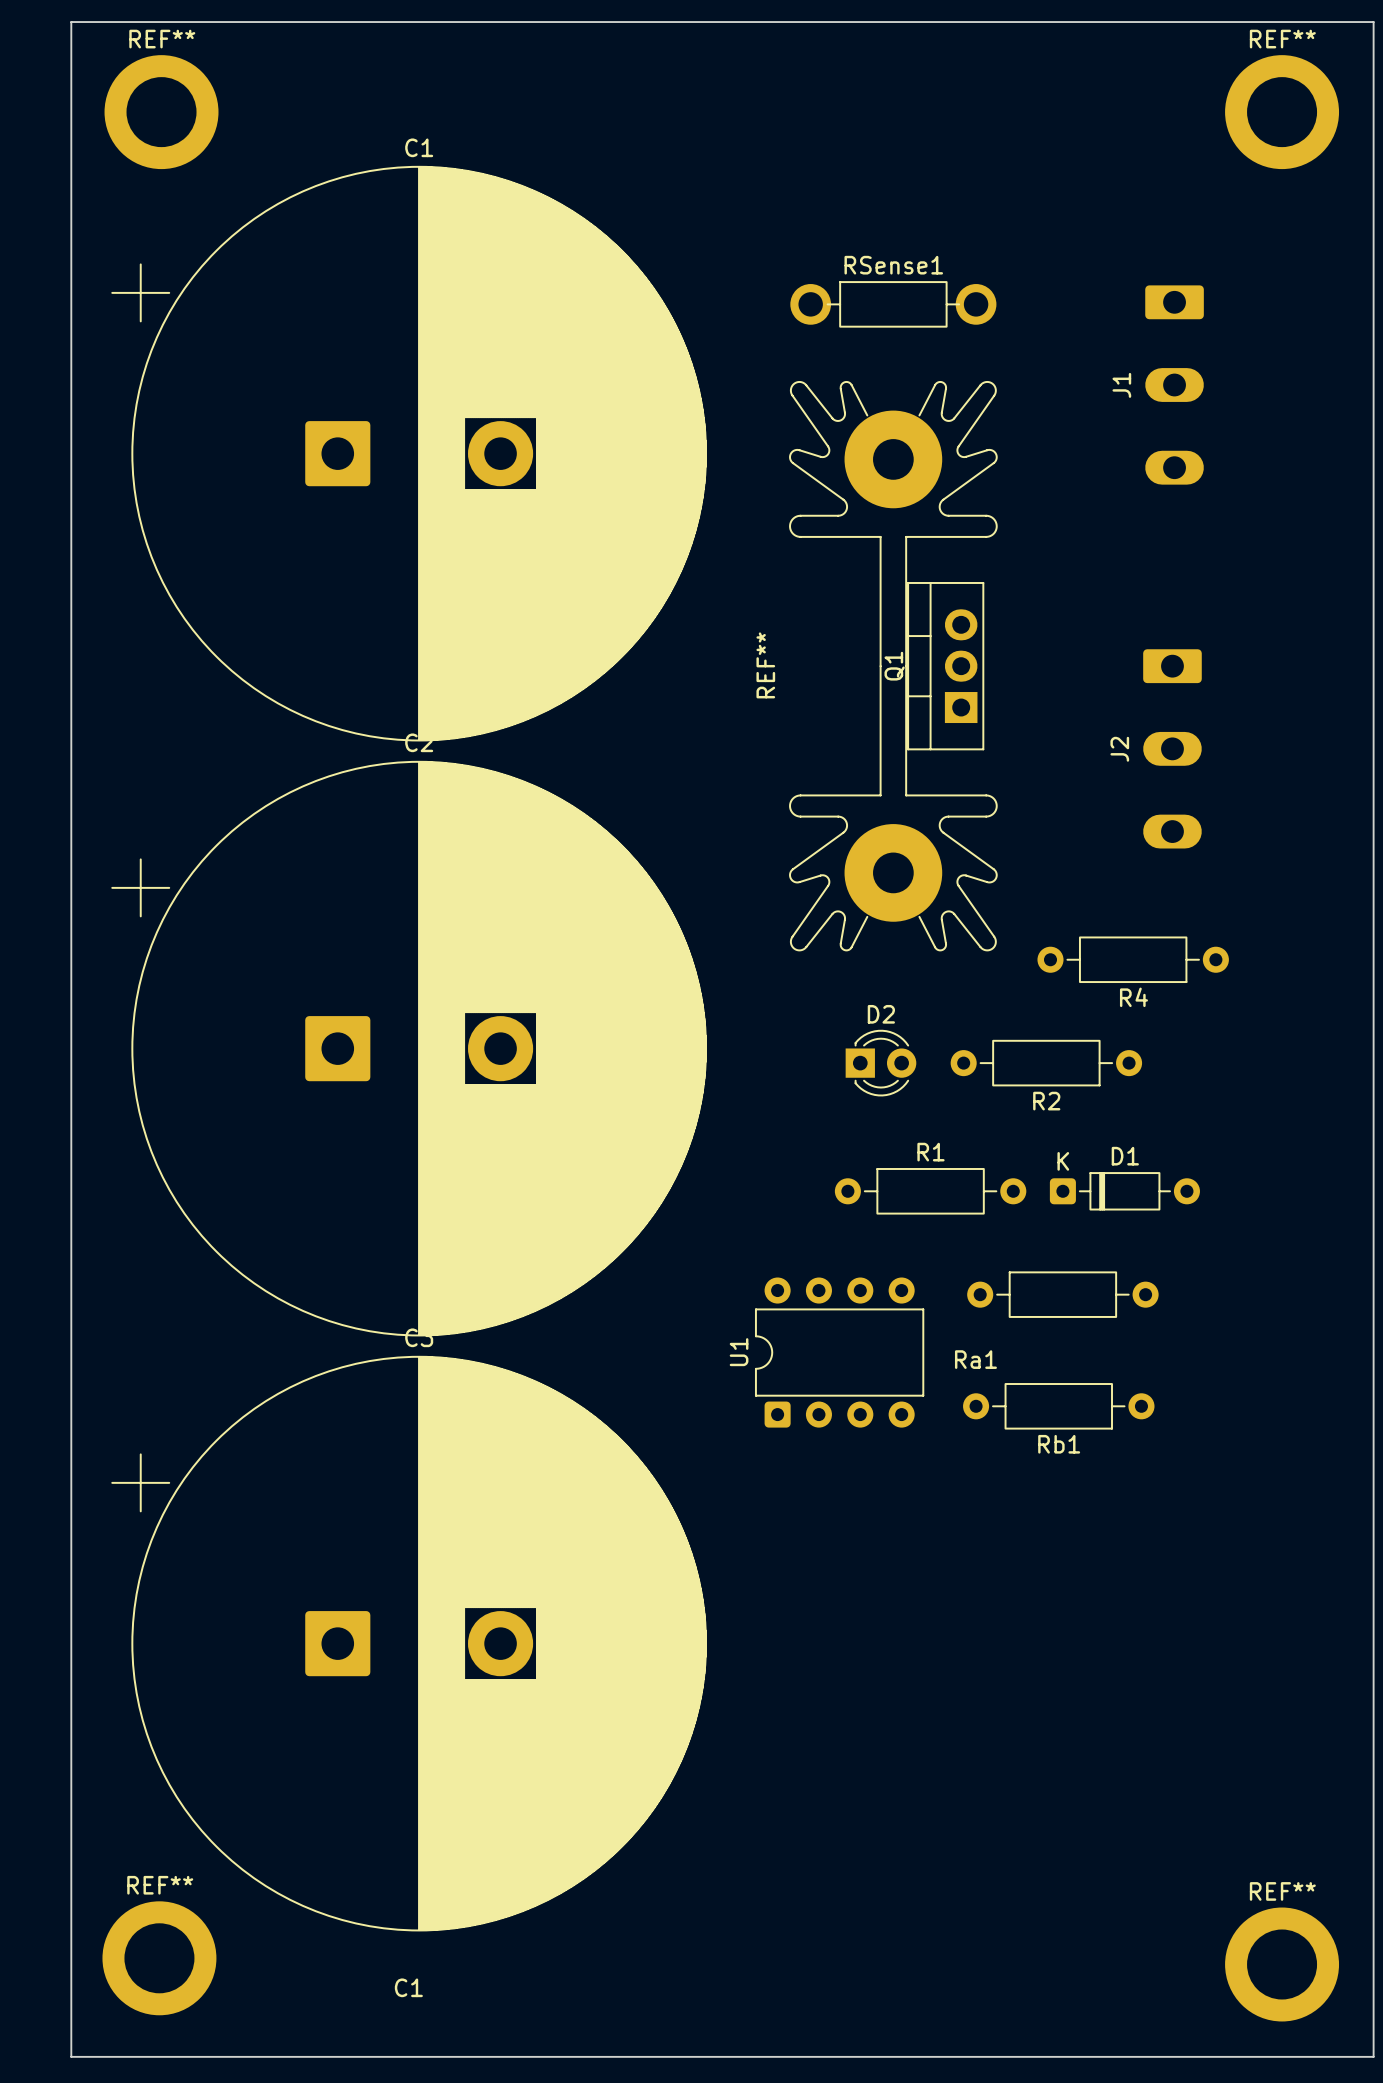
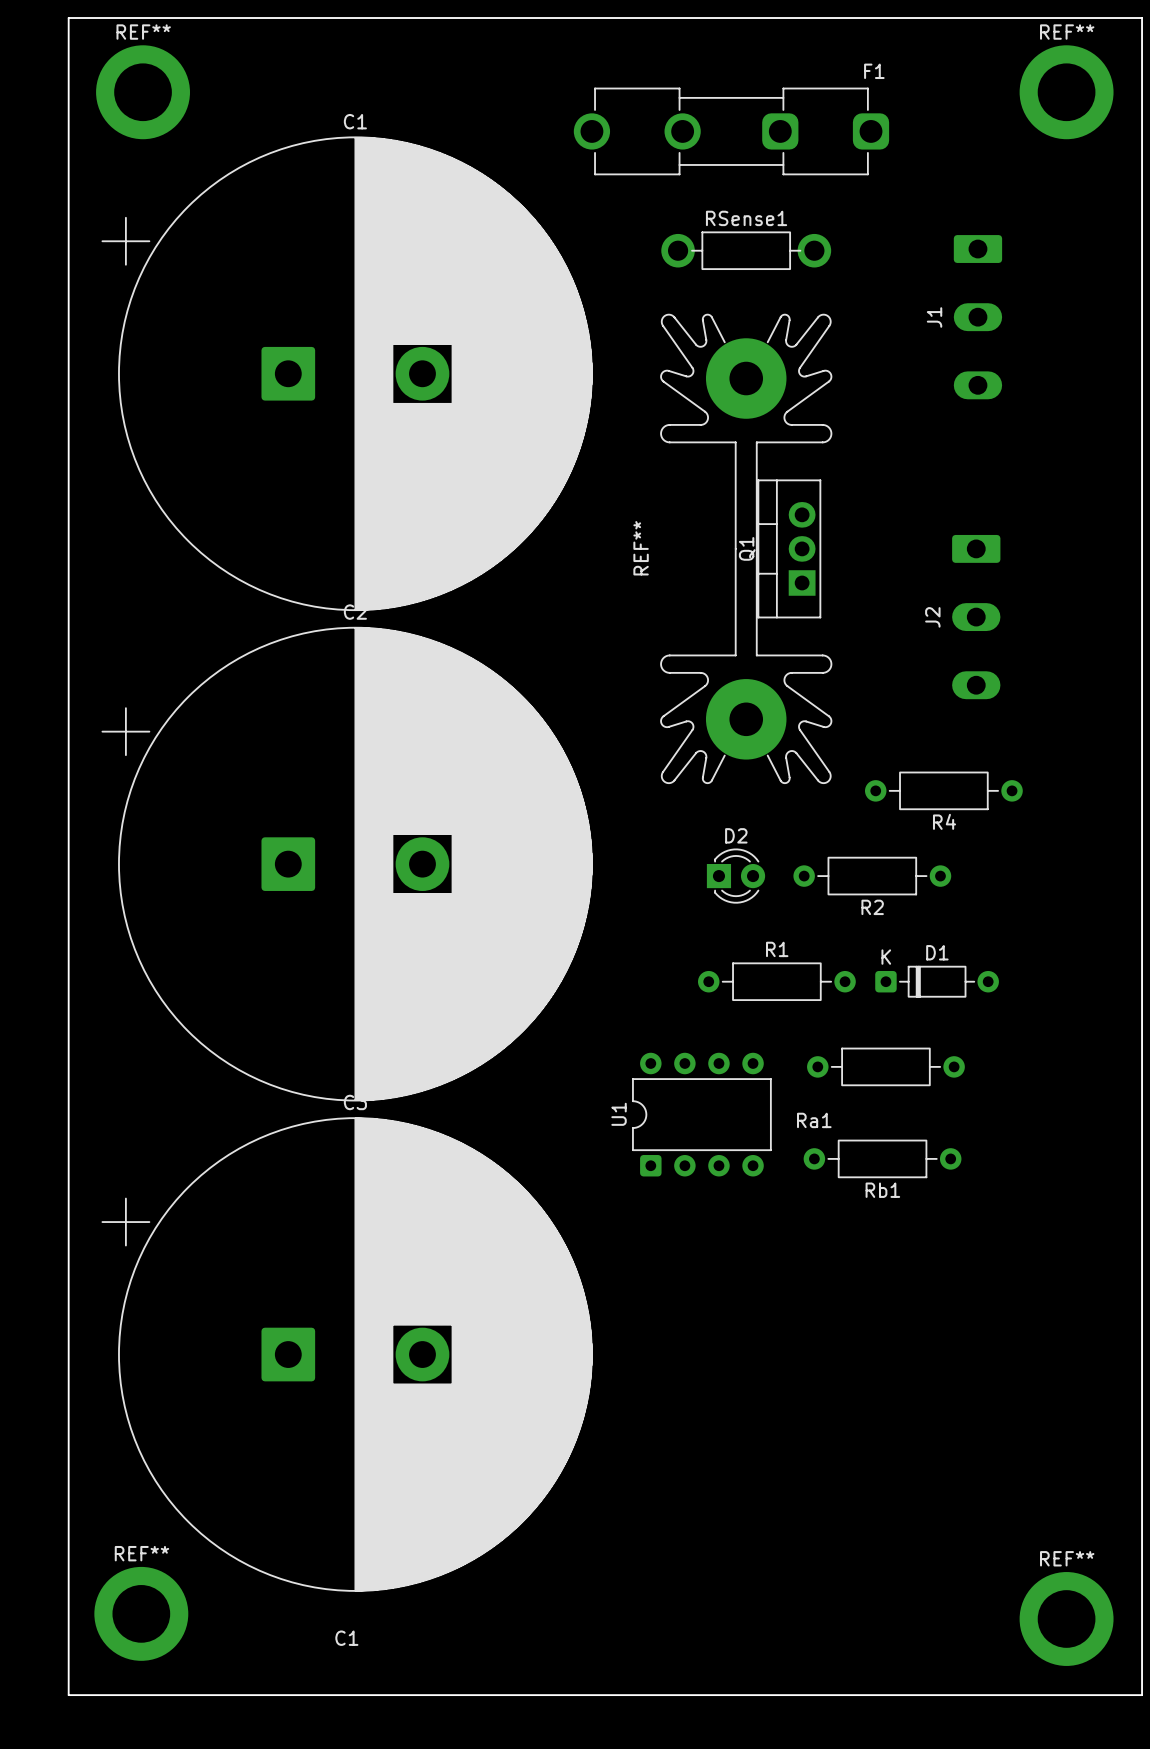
F1: none -> (731, 131)

